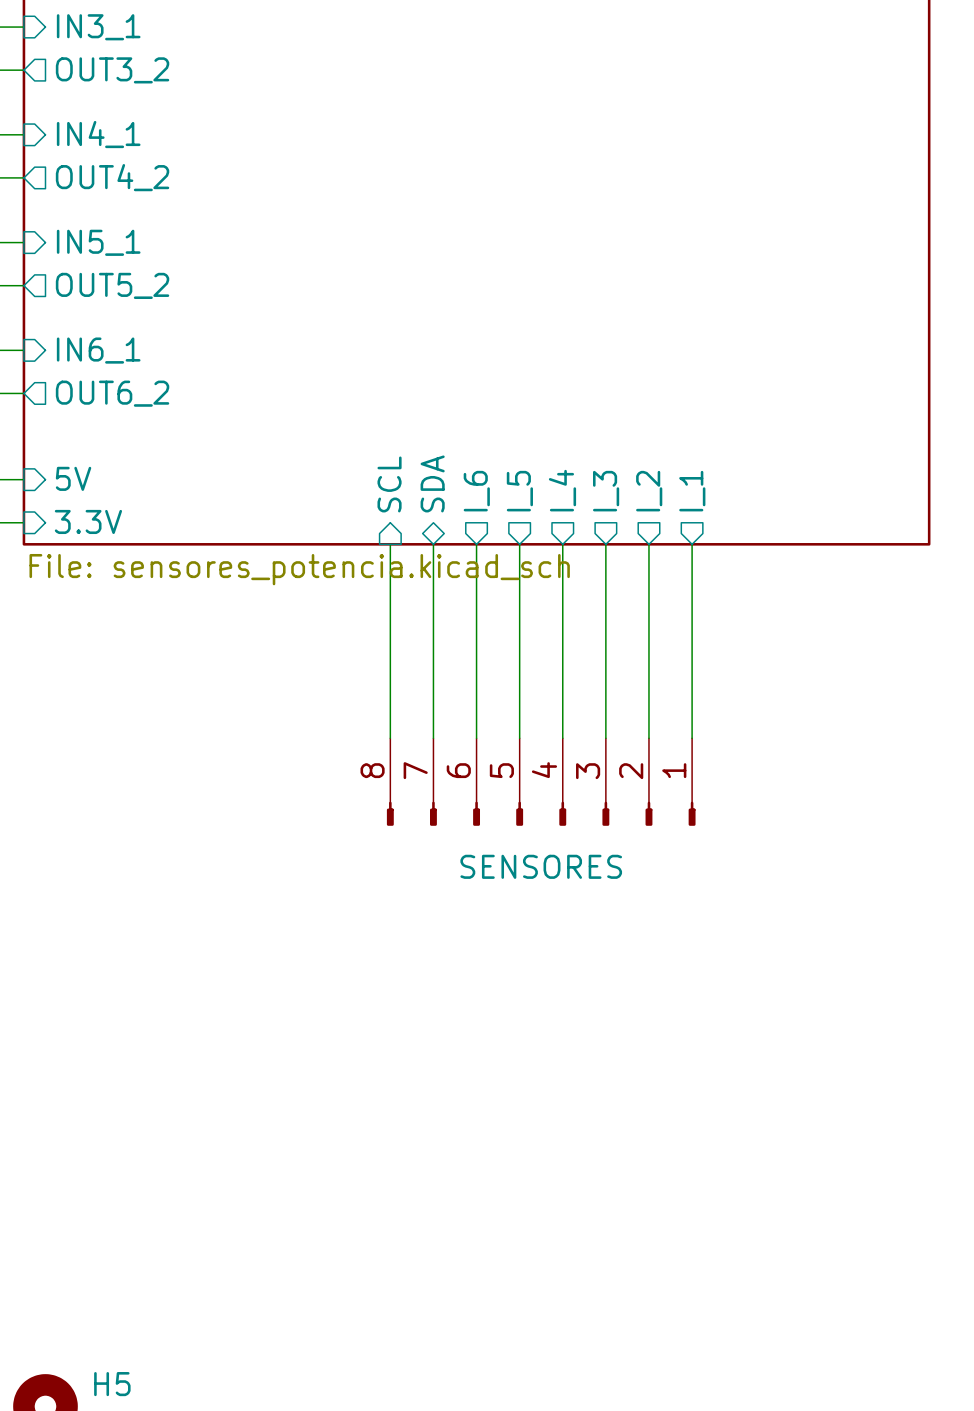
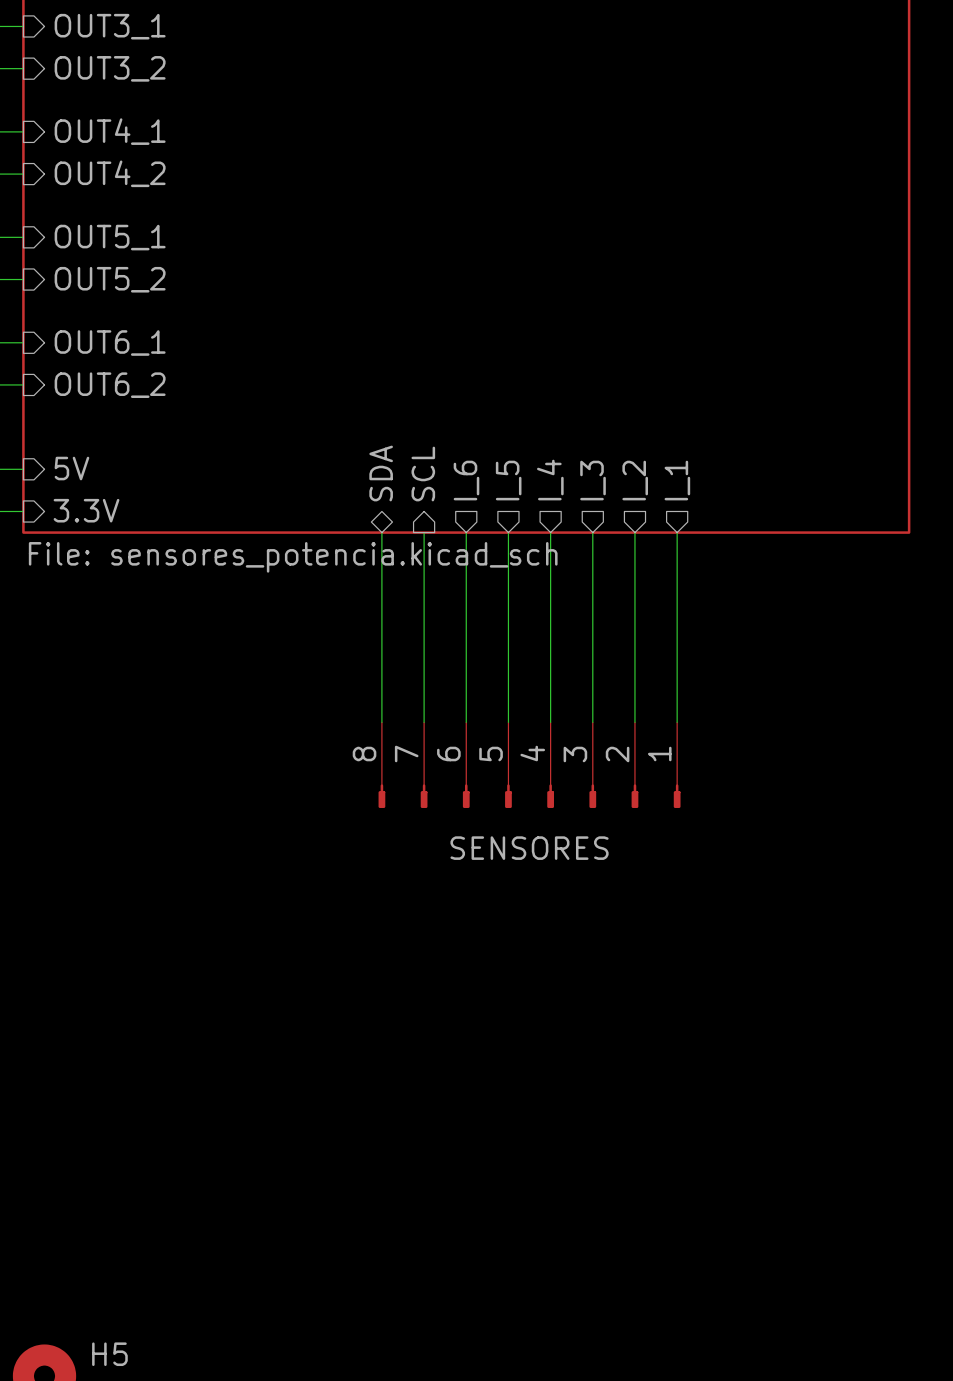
sheet pin: IN3_1 (98, 27) -> OUT3_1 (110, 26)
sheet pin shape: output (112, 70) -> input (110, 68)
sheet pin: IN4_1 (98, 134) -> OUT4_1 (110, 131)
sheet pin shape: output (112, 177) -> input (110, 173)
sheet pin: IN5_1 (98, 242) -> OUT5_1 (110, 237)
sheet pin shape: output (112, 285) -> input (110, 279)
sheet pin: IN6_1 (98, 350) -> OUT6_1 (110, 343)
sheet pin shape: output (112, 393) -> input (110, 385)
sheet pin shape: bidirectional (432, 483) -> input (423, 474)
sheet pin: SDA (432, 483) -> SCL (423, 474)
sheet pin shape: input (389, 484) -> bidirectional (381, 473)
sheet pin: SCL (389, 484) -> SDA (381, 473)

